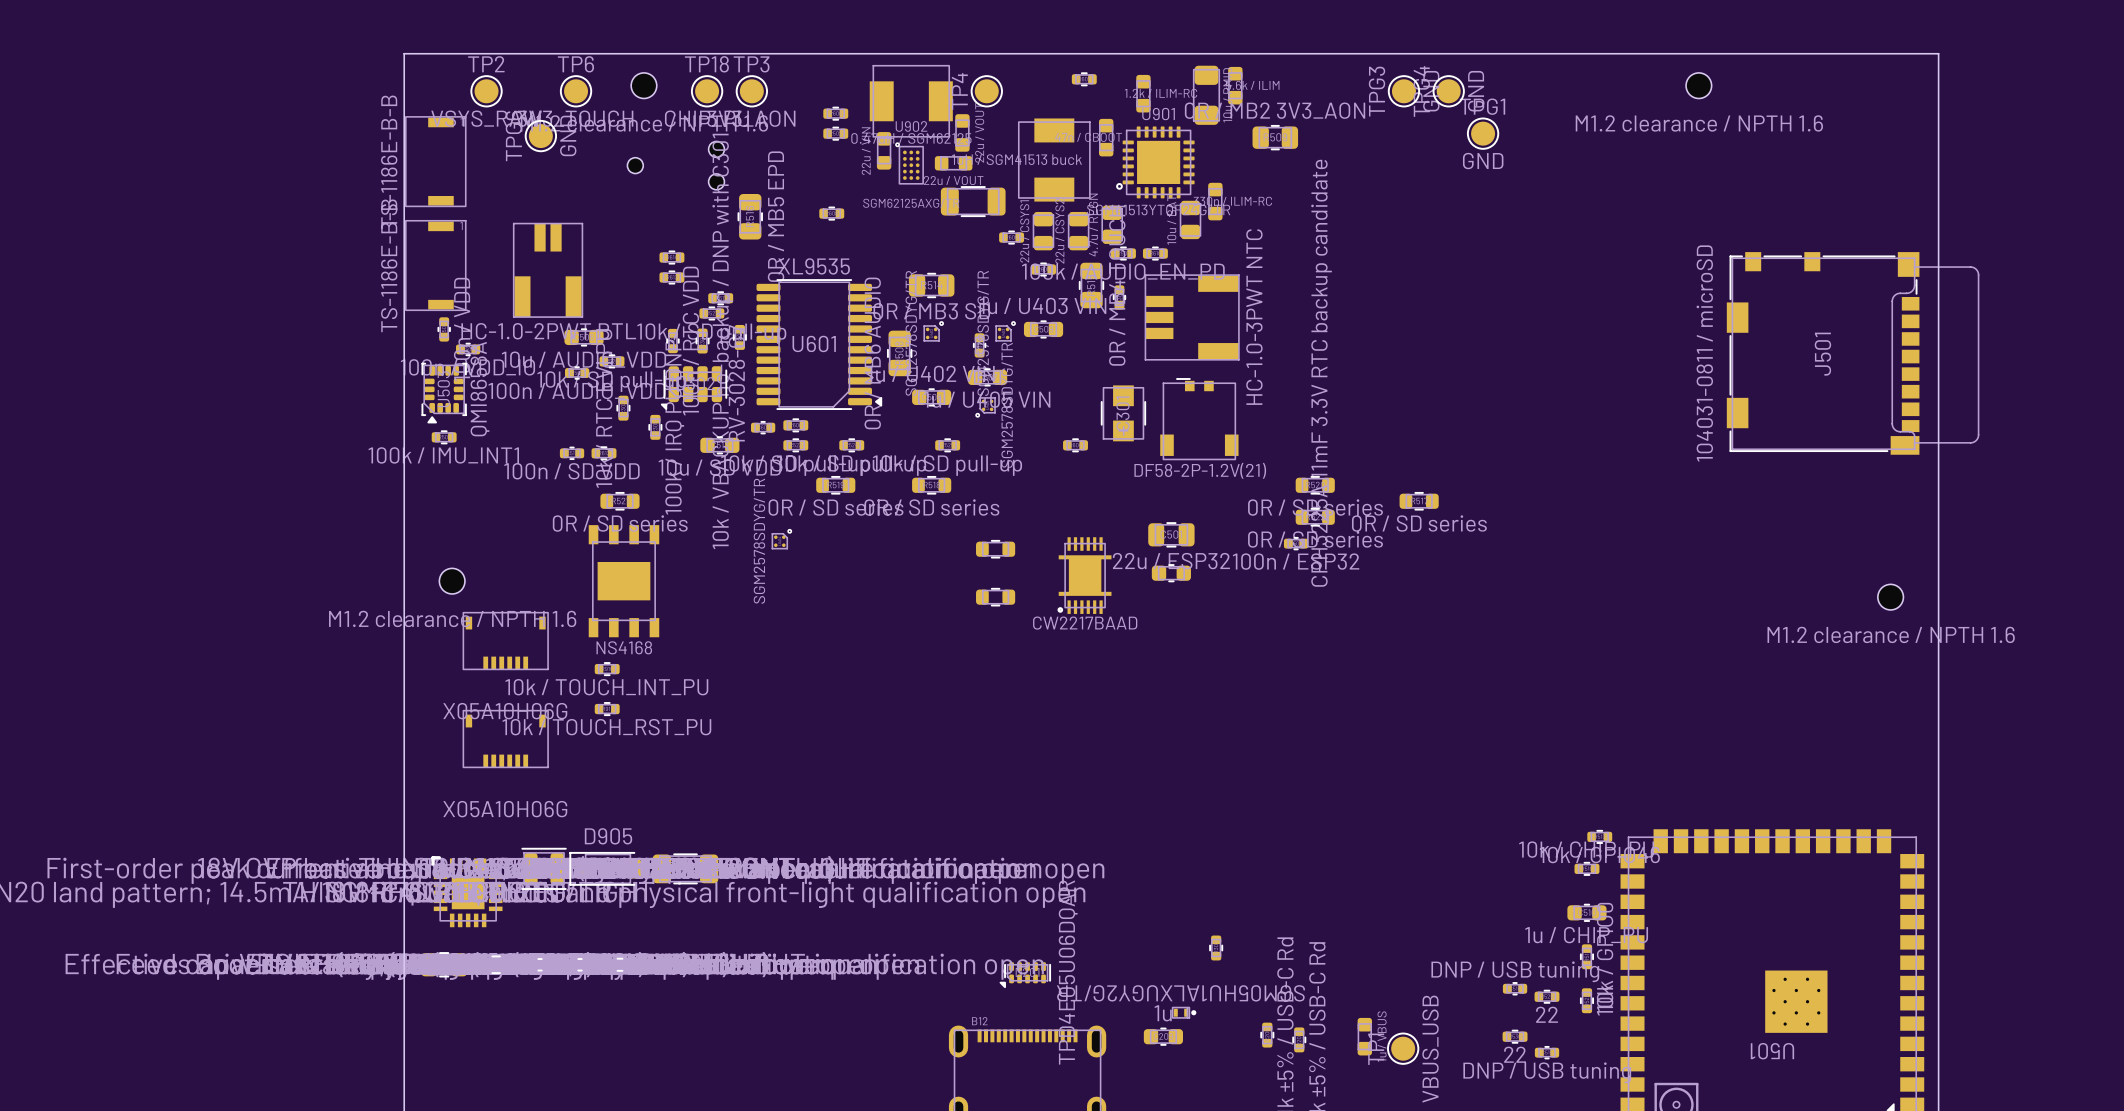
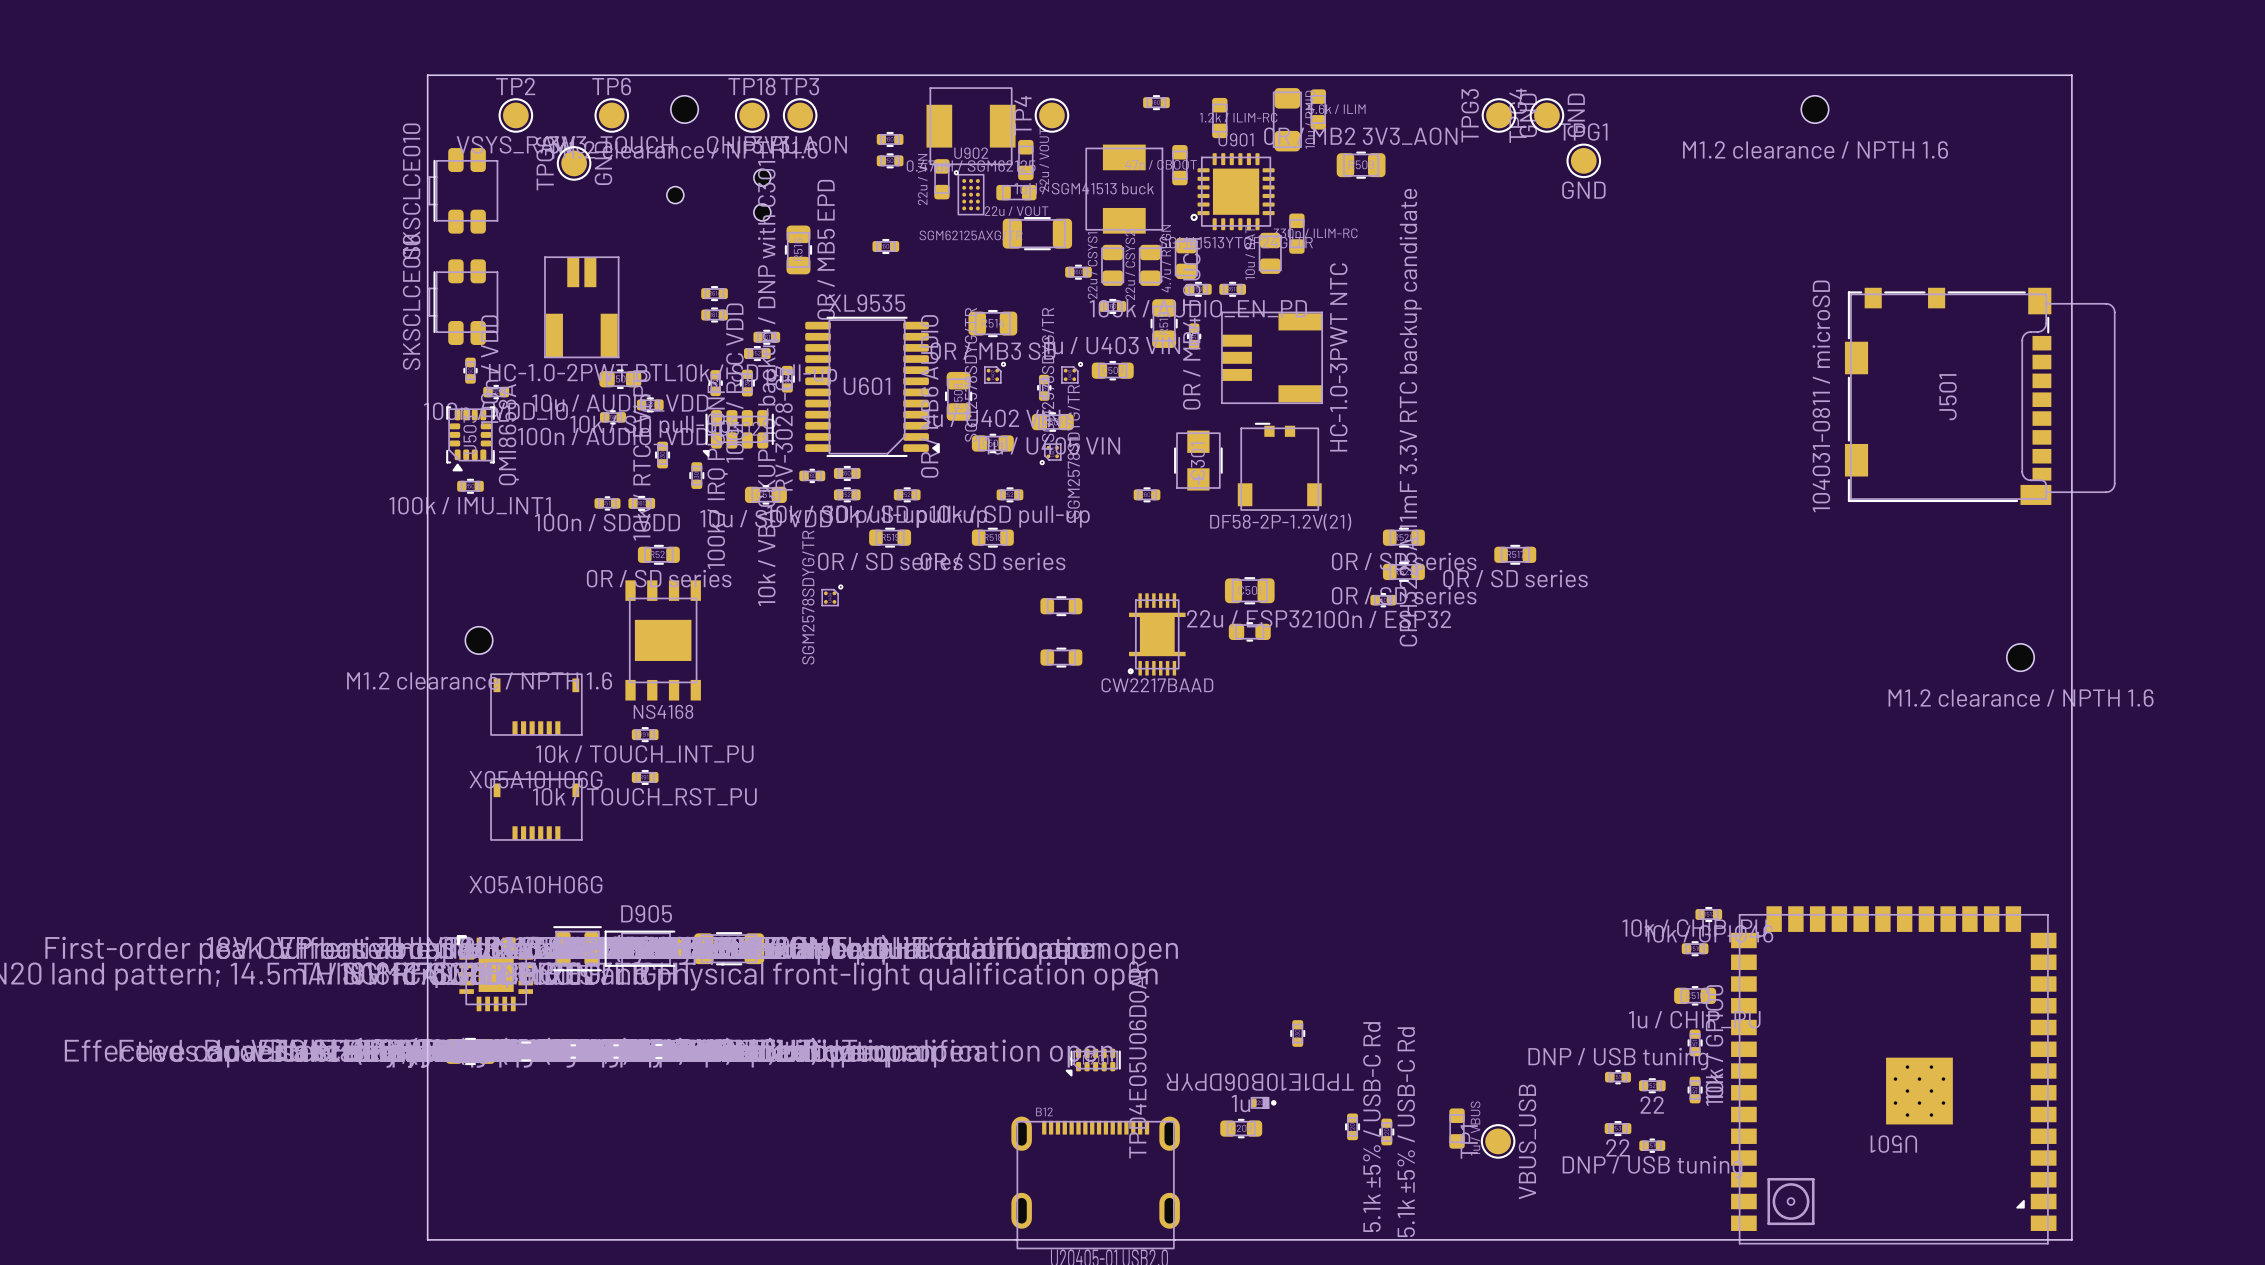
part footprint: [405, 116, 467, 208] -> [428, 148, 499, 234]
part value: TS-1186E-B-B (389, 161) -> SKSCLCE010 (411, 191)
part footprint: [405, 219, 467, 312] -> [428, 259, 499, 345]
part value: TS-1186E-B-B (389, 265) -> SKSCLCE010 (411, 302)
part: SGM05HU1ALXUGY2G/TR (1184, 1012) -> none
part: none -> TPD1E10B06DPYR (1263, 1102)

